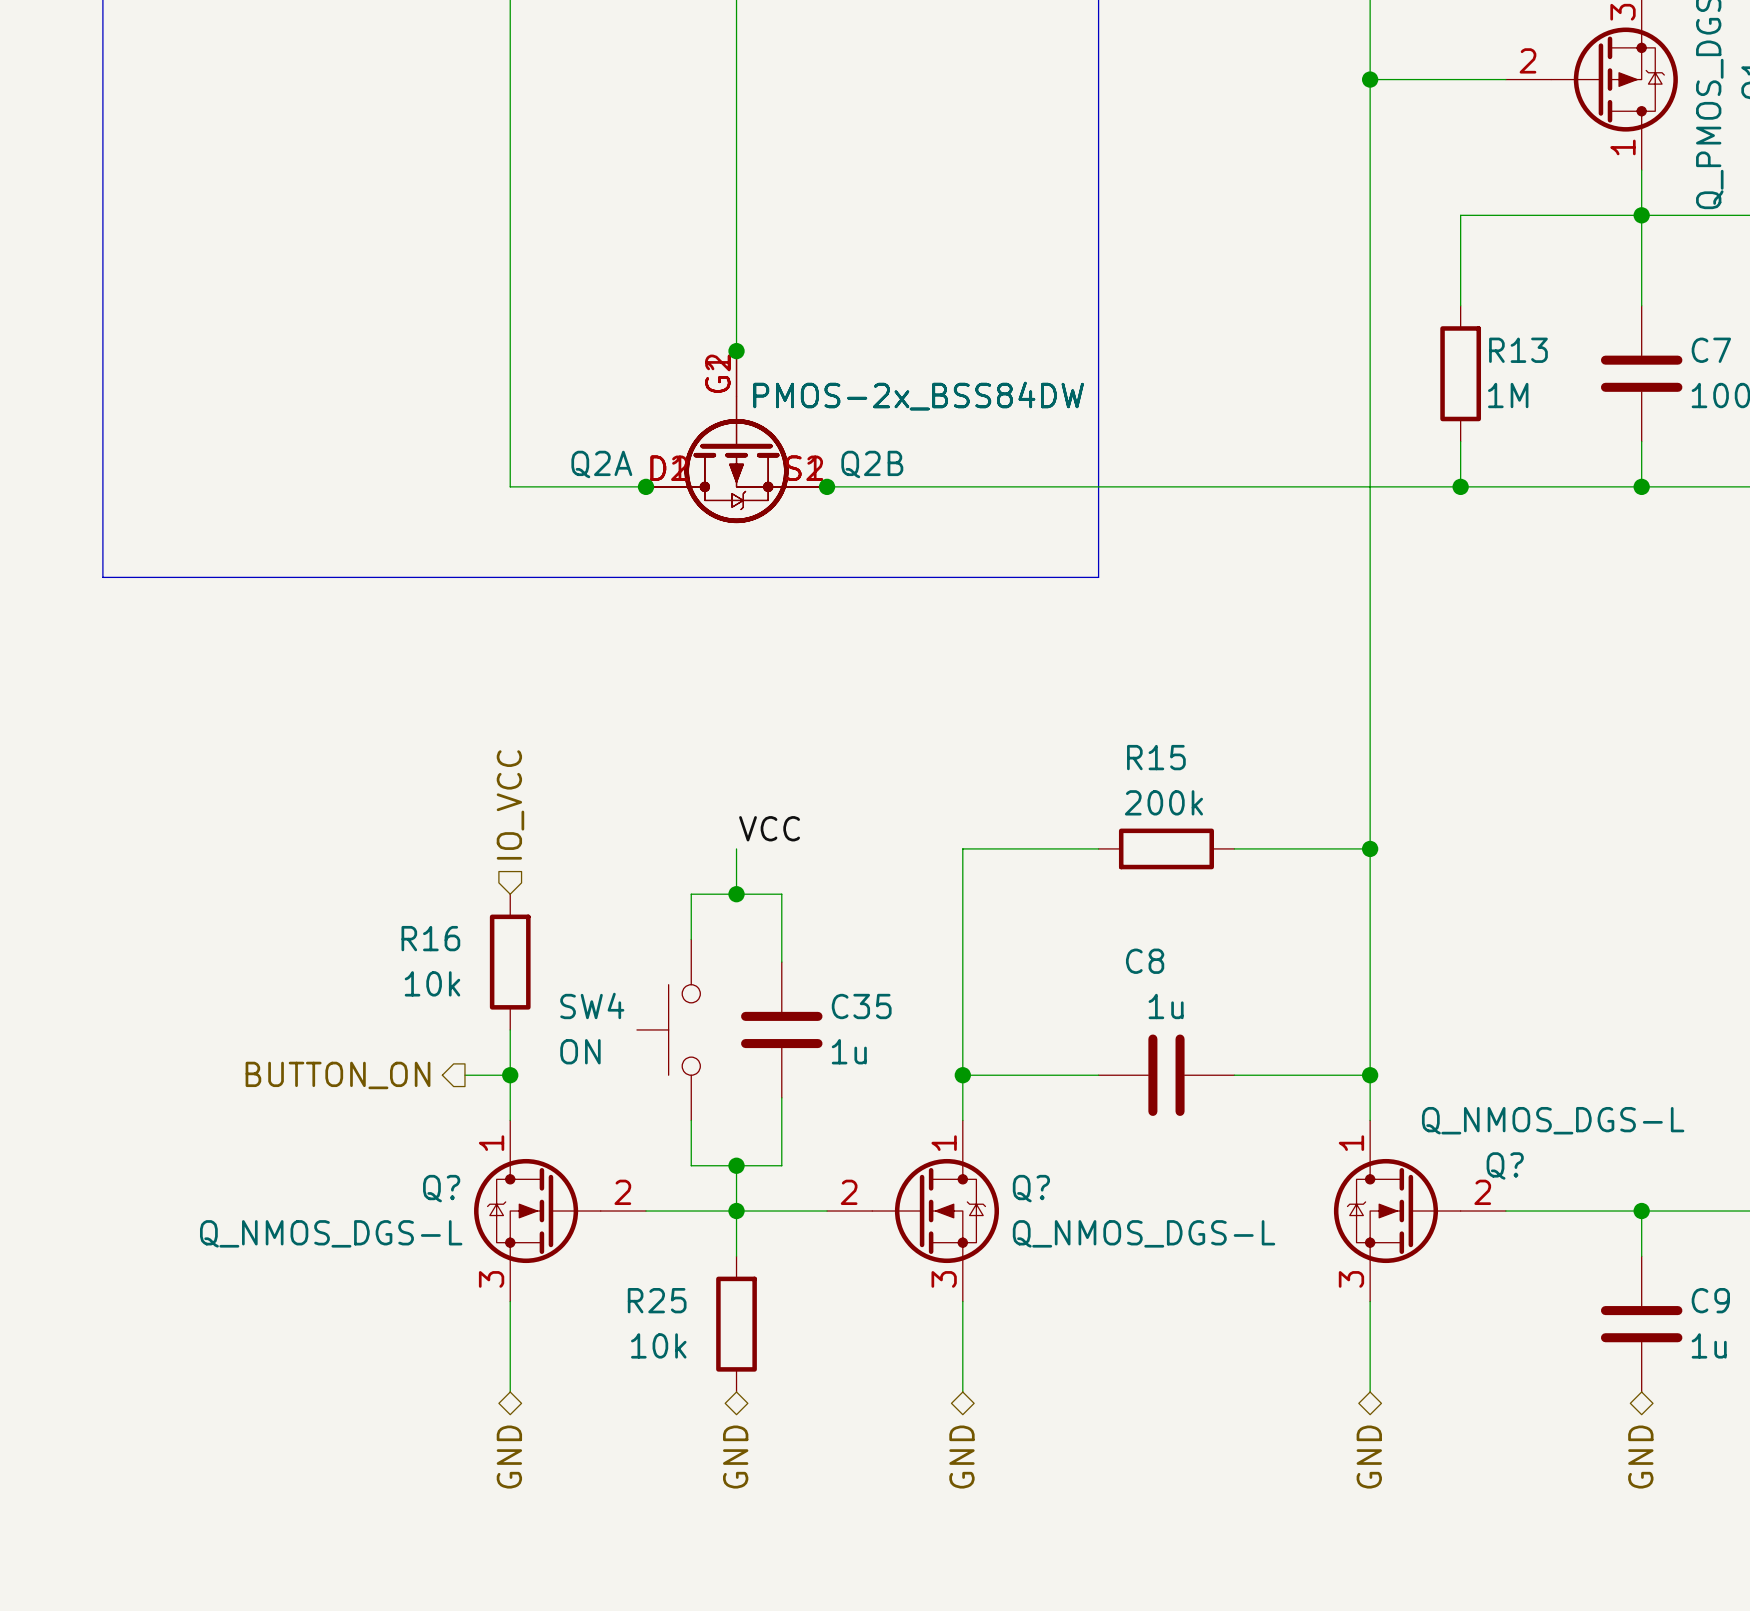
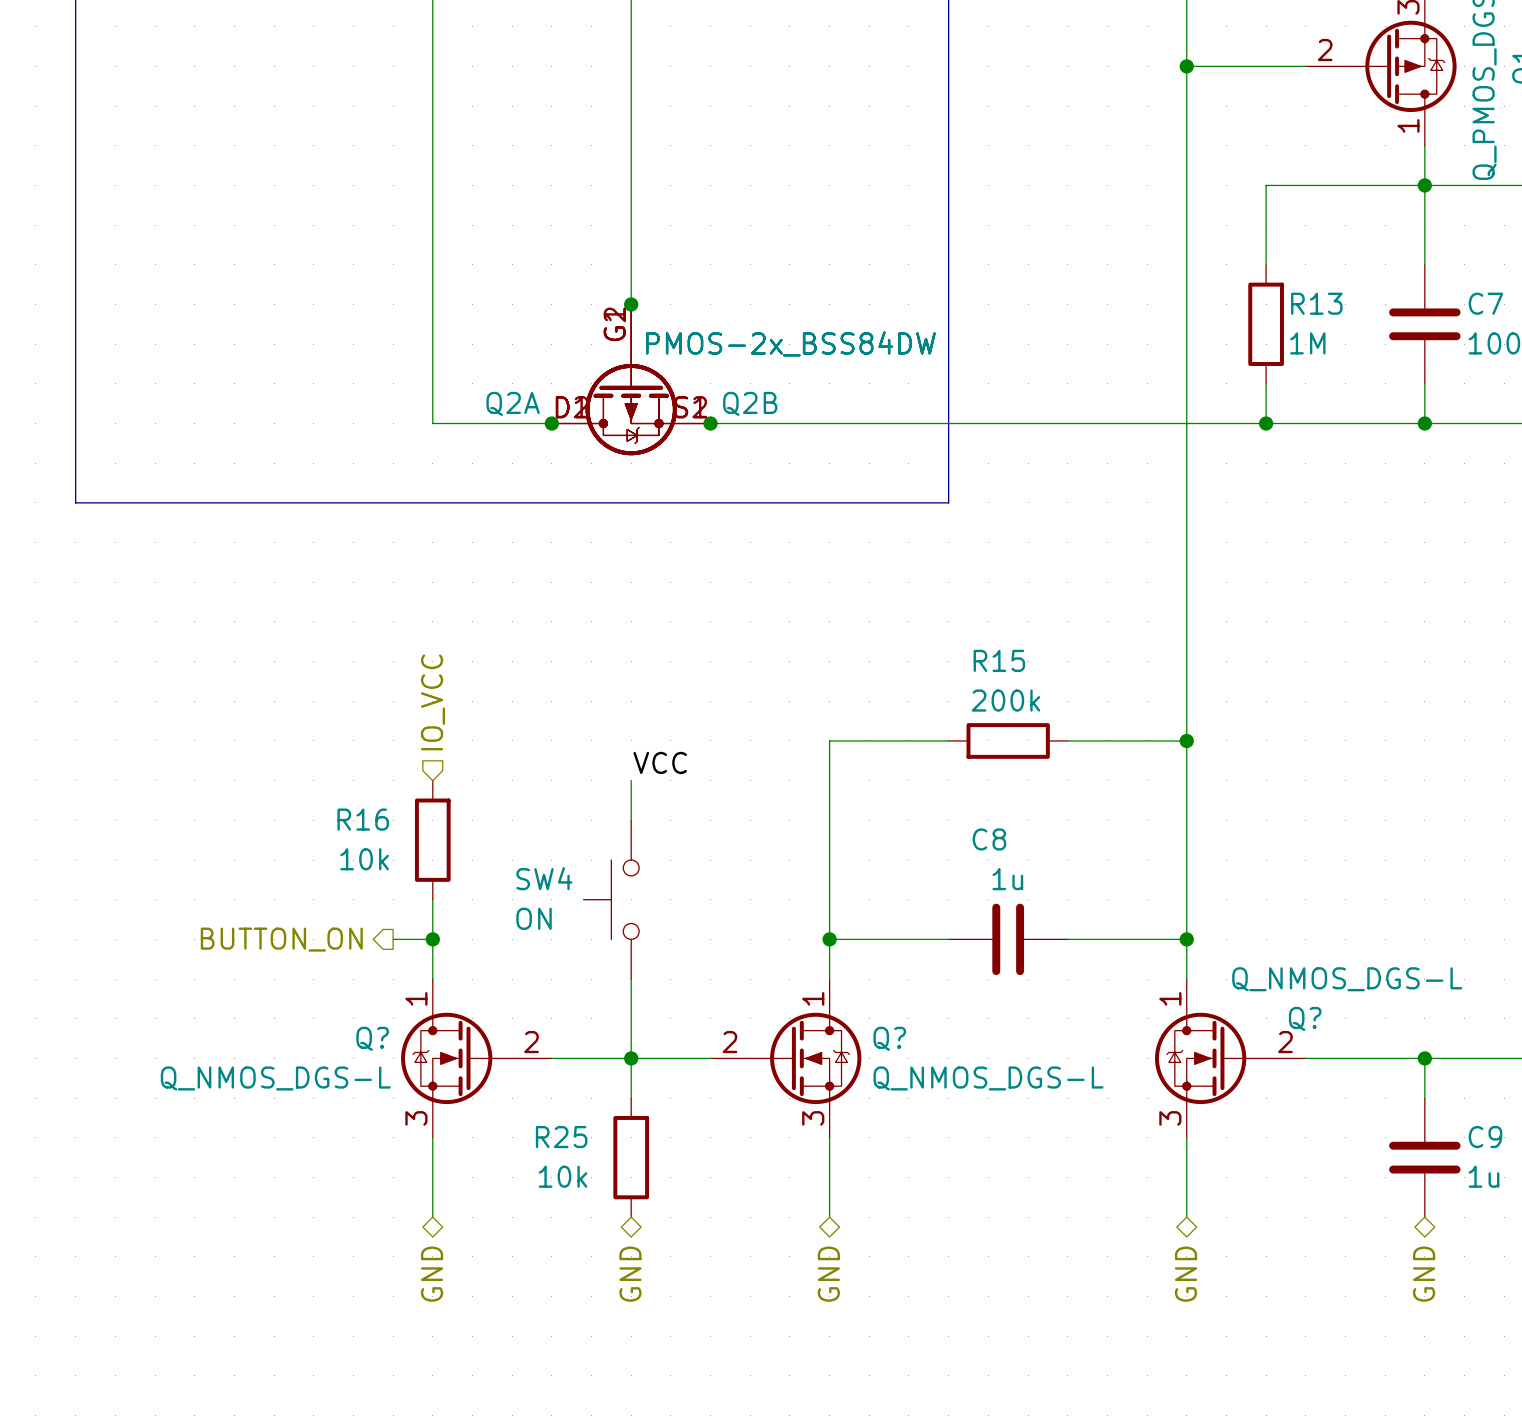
label position: VCC (769, 828) -> VCC (660, 762)
wire: (736, 848) (736, 894) -> (631, 820) (631, 780)
junction: (736, 894) -> none
wire: (691, 939) (691, 894) (781, 894) (781, 962) -> none
SW4 position: (668, 1029) -> (611, 899)
C35: 1u (781, 1029) -> none
wire: (781, 1097) (781, 1165) (691, 1165) (691, 1120) -> none
wire: none -> (631, 979) (631, 1018)
junction: (736, 1165) -> none

